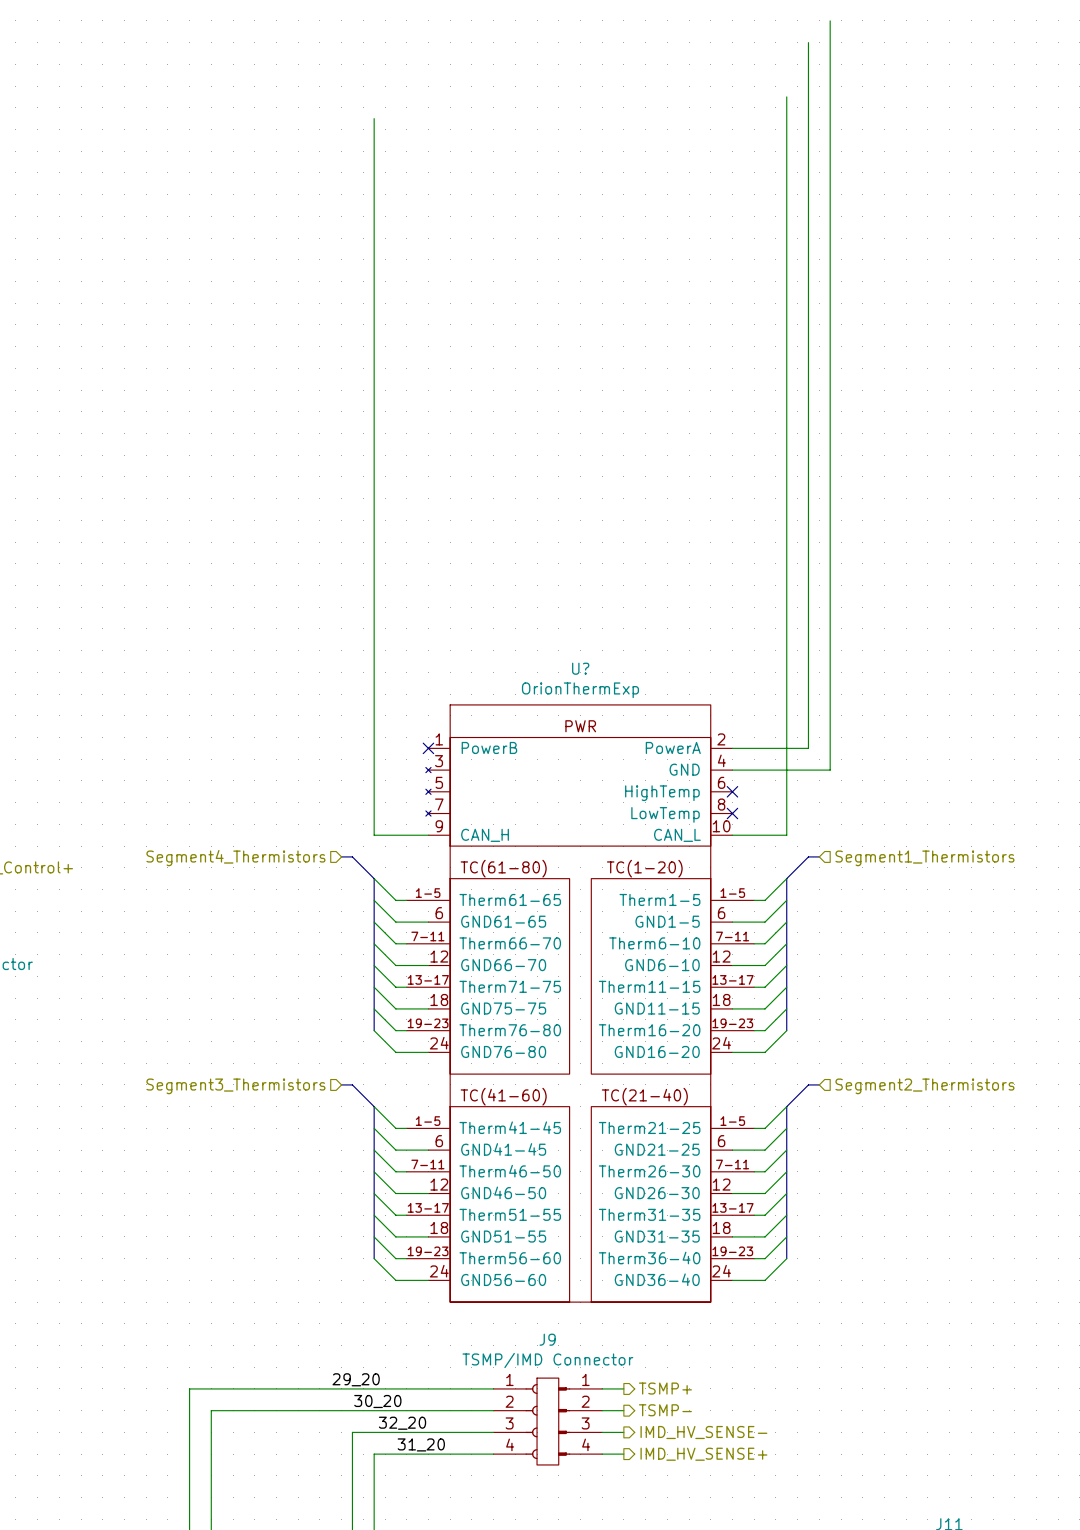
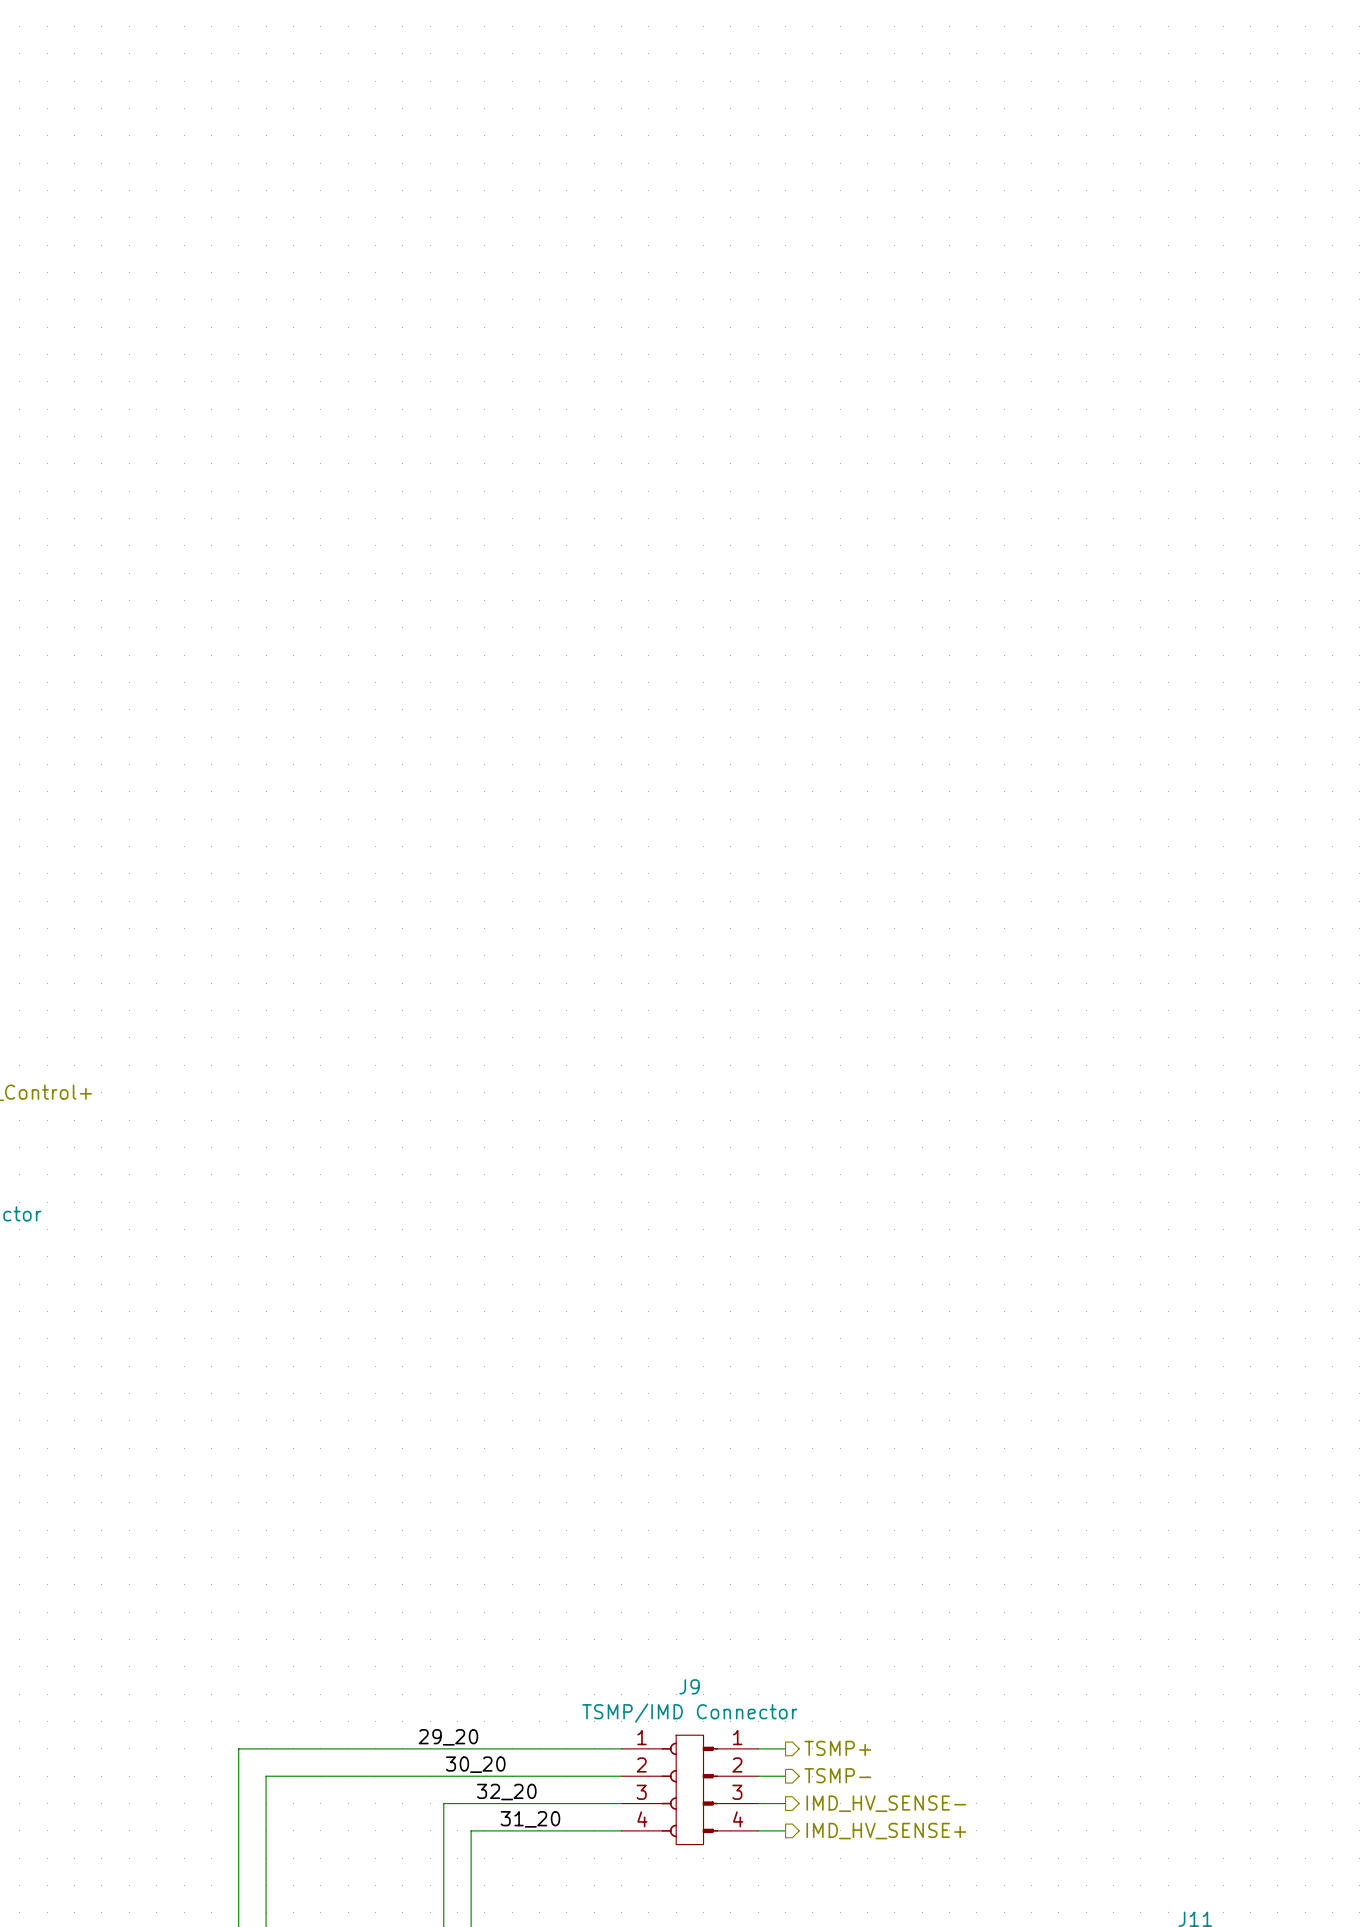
wire: (830, 20) (830, 770) (732, 770) -> none
wire: (808, 42) (808, 748) (732, 748) -> none
wire: (786, 96) (786, 835) (732, 835) -> none
wire: (374, 118) (374, 835) (428, 835) -> none
no-connect mark: (428, 748) -> none
no-connect mark: (732, 791) -> none
no-connect mark: (732, 813) -> none
bus: (341, 856) (352, 856) (374, 878) (374, 1030) -> none
bus: (819, 856) (808, 856) (786, 878) (786, 1030) -> none
hierarchical label: Segment4_Thermistors (235, 858) -> none
hierarchical label: Segment1_Thermistors (924, 858) -> none
wire: (374, 878) (395, 900) (406, 900) -> none
wire: (786, 878) (765, 900) (754, 900) -> none
wire: (374, 900) (395, 922) (428, 922) -> none
wire: (786, 900) (765, 922) (732, 922) -> none
wire: (374, 922) (395, 943) (406, 943) -> none
wire: (786, 922) (765, 943) (754, 943) -> none
wire: (374, 943) (395, 965) (428, 965) -> none
wire: (786, 943) (765, 965) (732, 965) -> none
wire: (374, 965) (395, 987) (406, 987) -> none
wire: (786, 965) (765, 987) (754, 987) -> none
wire: (374, 987) (395, 1008) (428, 1008) -> none
wire: (786, 987) (765, 1008) (732, 1008) -> none
U?: OrionThermExp (580, 1003) -> none
wire: (374, 1008) (395, 1030) (406, 1030) -> none
wire: (786, 1008) (765, 1030) (754, 1030) -> none
wire: (374, 1030) (395, 1052) (428, 1052) -> none
wire: (786, 1030) (765, 1052) (732, 1052) -> none
bus: (341, 1084) (352, 1084) (374, 1106) (374, 1258) -> none
bus: (819, 1084) (808, 1084) (786, 1106) (786, 1258) -> none
hierarchical label: Segment3_Thermistors (235, 1086) -> none
hierarchical label: Segment2_Thermistors (924, 1086) -> none
wire: (374, 1106) (395, 1128) (406, 1128) -> none
wire: (786, 1106) (765, 1128) (754, 1128) -> none
wire: (374, 1128) (395, 1150) (428, 1150) -> none
wire: (786, 1128) (765, 1150) (732, 1150) -> none
wire: (374, 1150) (395, 1171) (406, 1171) -> none
wire: (786, 1150) (765, 1171) (754, 1171) -> none
wire: (374, 1171) (395, 1193) (428, 1193) -> none
wire: (786, 1171) (765, 1193) (732, 1193) -> none
wire: (374, 1193) (395, 1215) (406, 1215) -> none
wire: (786, 1193) (765, 1215) (754, 1215) -> none
wire: (374, 1215) (395, 1236) (428, 1236) -> none
wire: (786, 1215) (765, 1236) (732, 1236) -> none
wire: (374, 1236) (395, 1258) (406, 1258) -> none
wire: (786, 1236) (765, 1258) (754, 1258) -> none
wire: (374, 1258) (395, 1280) (428, 1280) -> none
wire: (786, 1258) (765, 1280) (732, 1280) -> none

